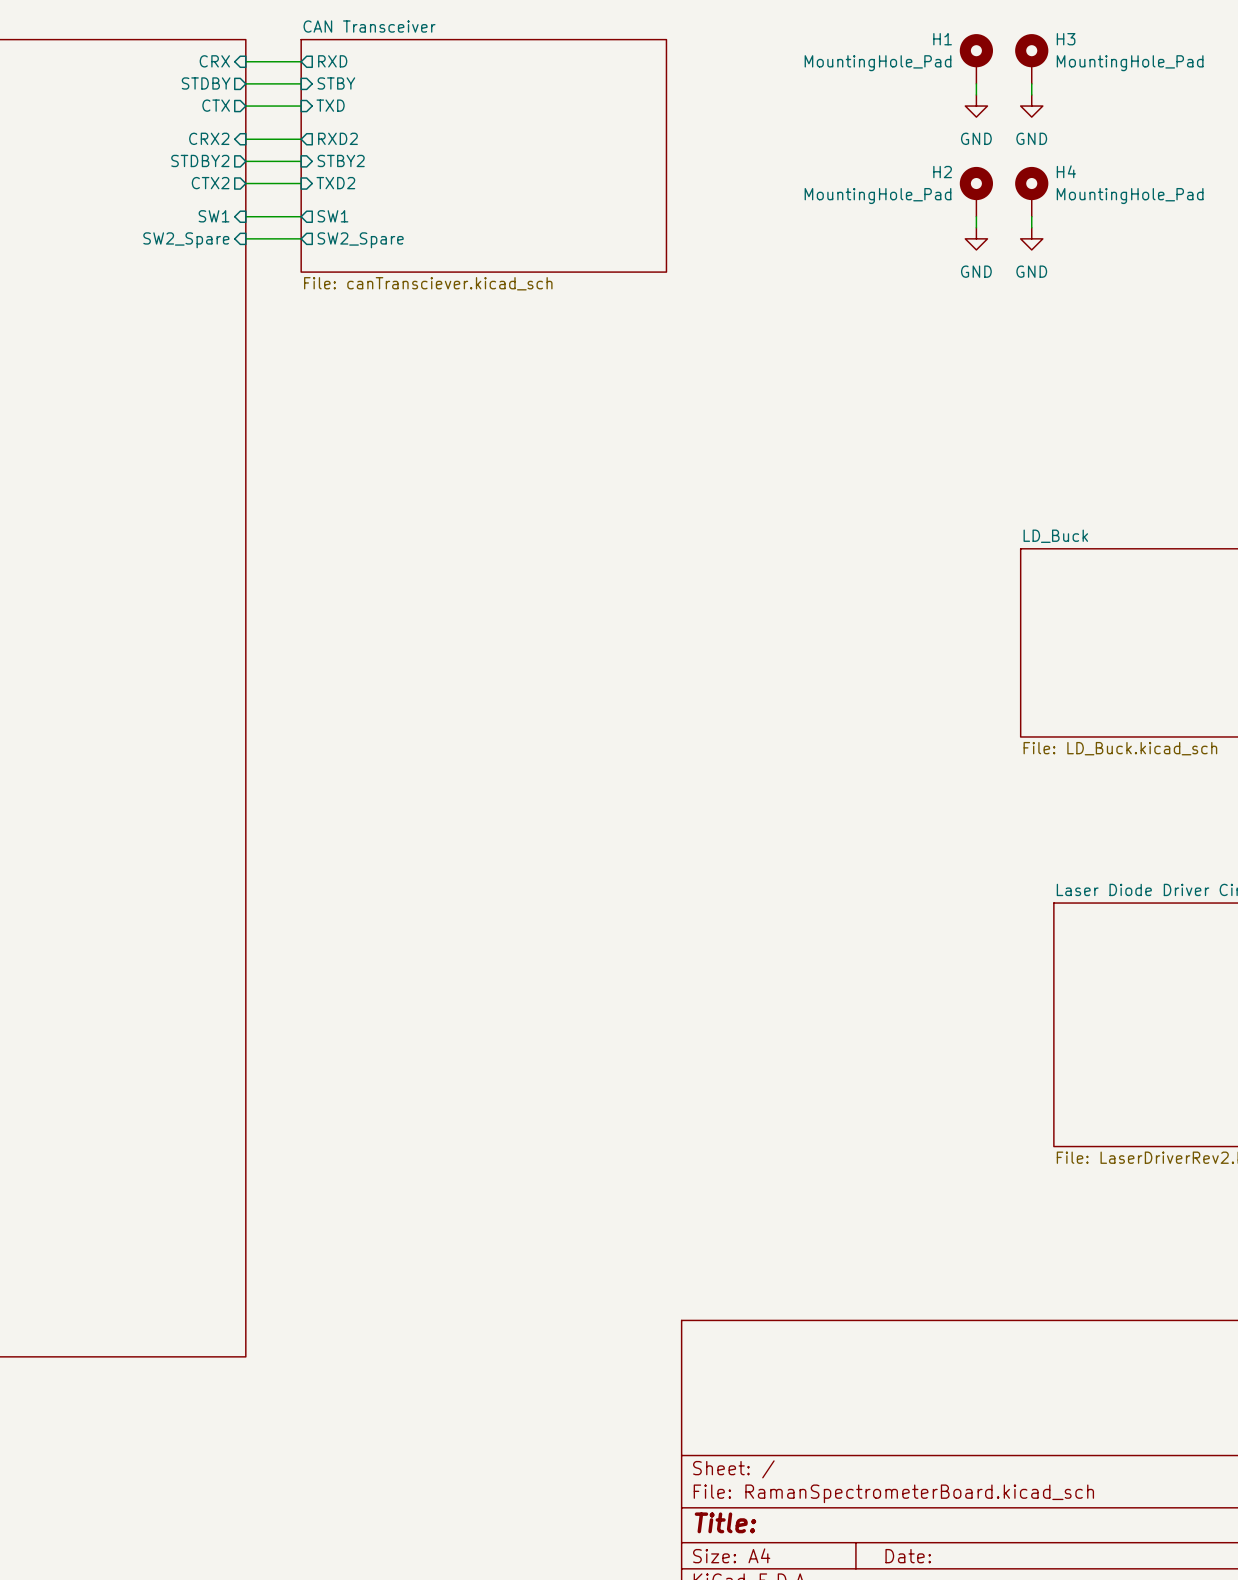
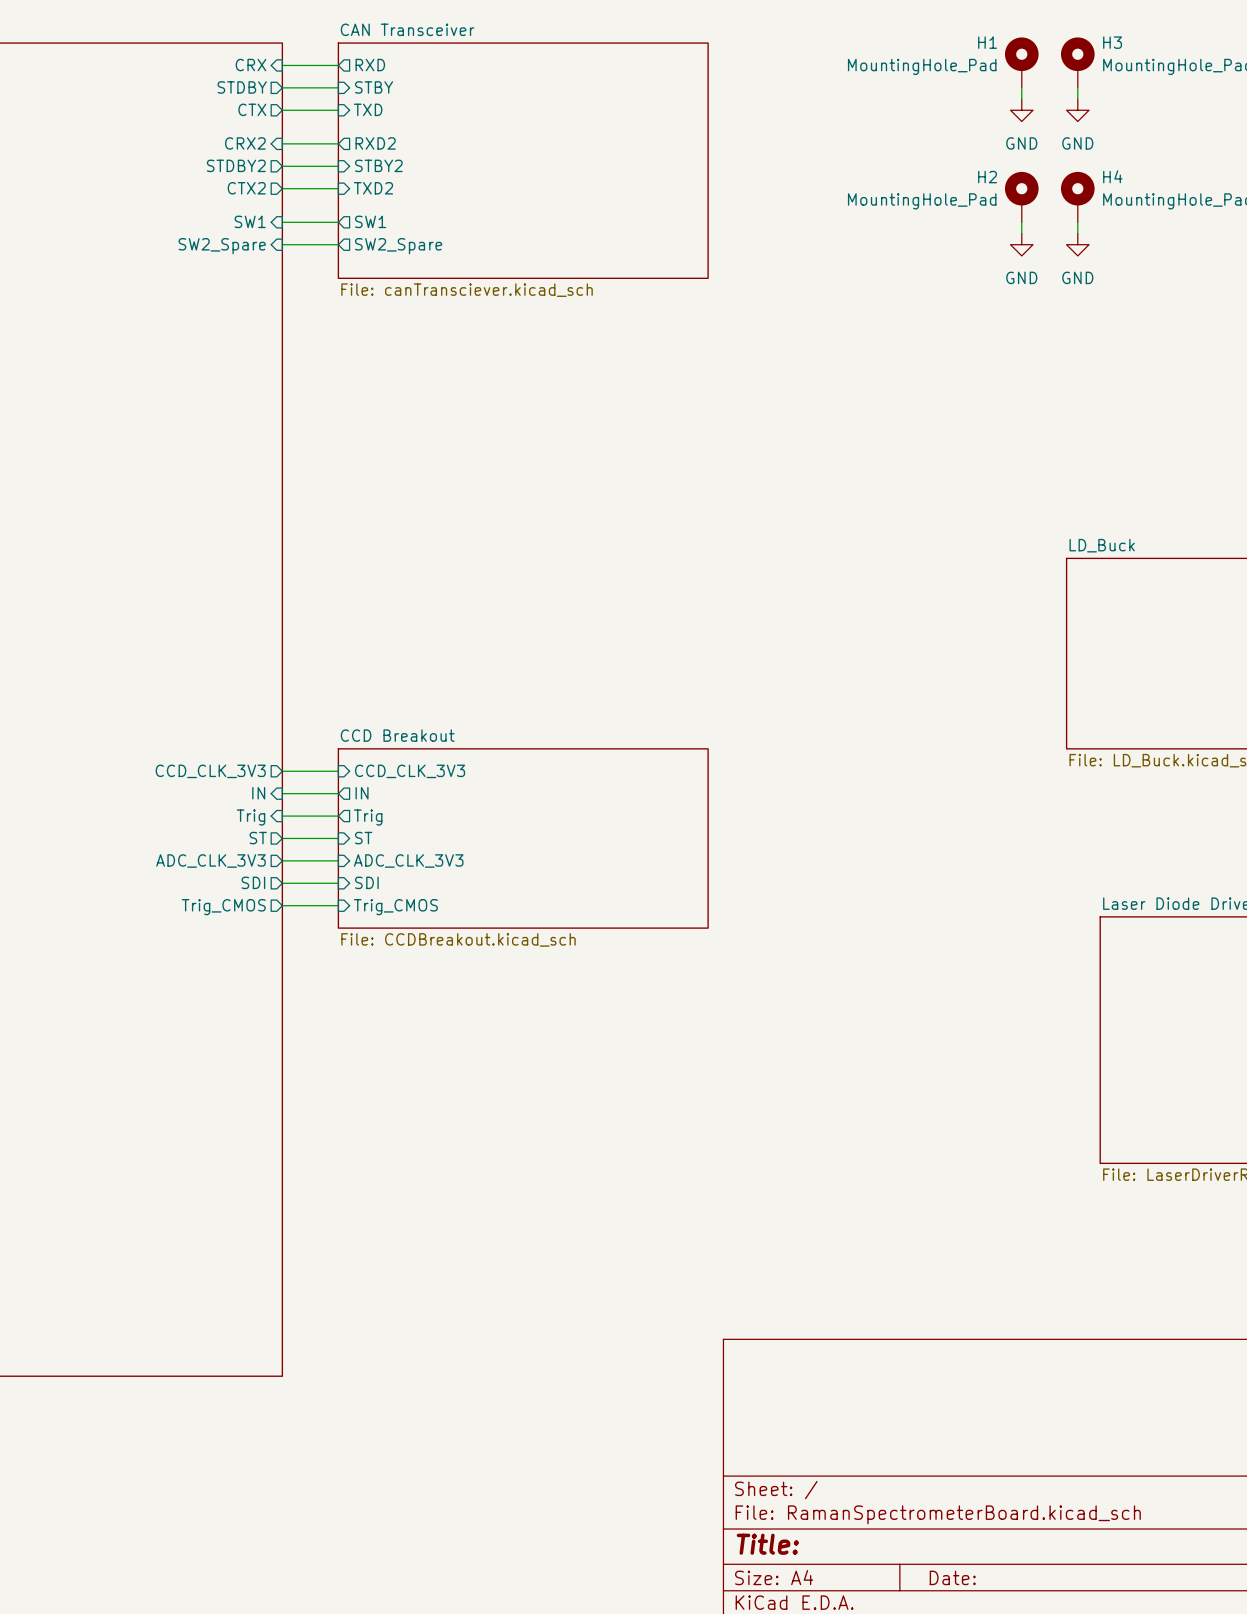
sheet pin: none -> CCD_CLK_3V3 (210, 771)
wire: none -> (282, 771) (338, 771)
sheet pin: none -> CCD_CLK_3V3 (410, 771)
sheet pin: none -> IN (258, 793)
sheet pin: none -> IN (362, 793)
wire: none -> (282, 793) (338, 793)
wire: none -> (282, 816) (338, 816)
sheet pin: none -> Trig (250, 817)
sheet pin: none -> Trig (368, 817)
sheet pin: none -> ST (258, 838)
wire: none -> (282, 838) (338, 838)
sheet pin: none -> ST (363, 838)
sheet CCD Breakout: none -> File: CCDBreakout.kicad_sch (523, 838)
sheet pin: none -> ADC_CLK_3V3 (210, 860)
wire: none -> (282, 860) (338, 860)
sheet pin: none -> ADC_CLK_3V3 (408, 860)
sheet pin: none -> SDI (253, 882)
wire: none -> (282, 883) (338, 883)
sheet pin: none -> SDI (366, 882)
wire: none -> (282, 905) (338, 905)
sheet pin: none -> Trig_CMOS (223, 907)
sheet pin: none -> Trig_CMOS (395, 907)

